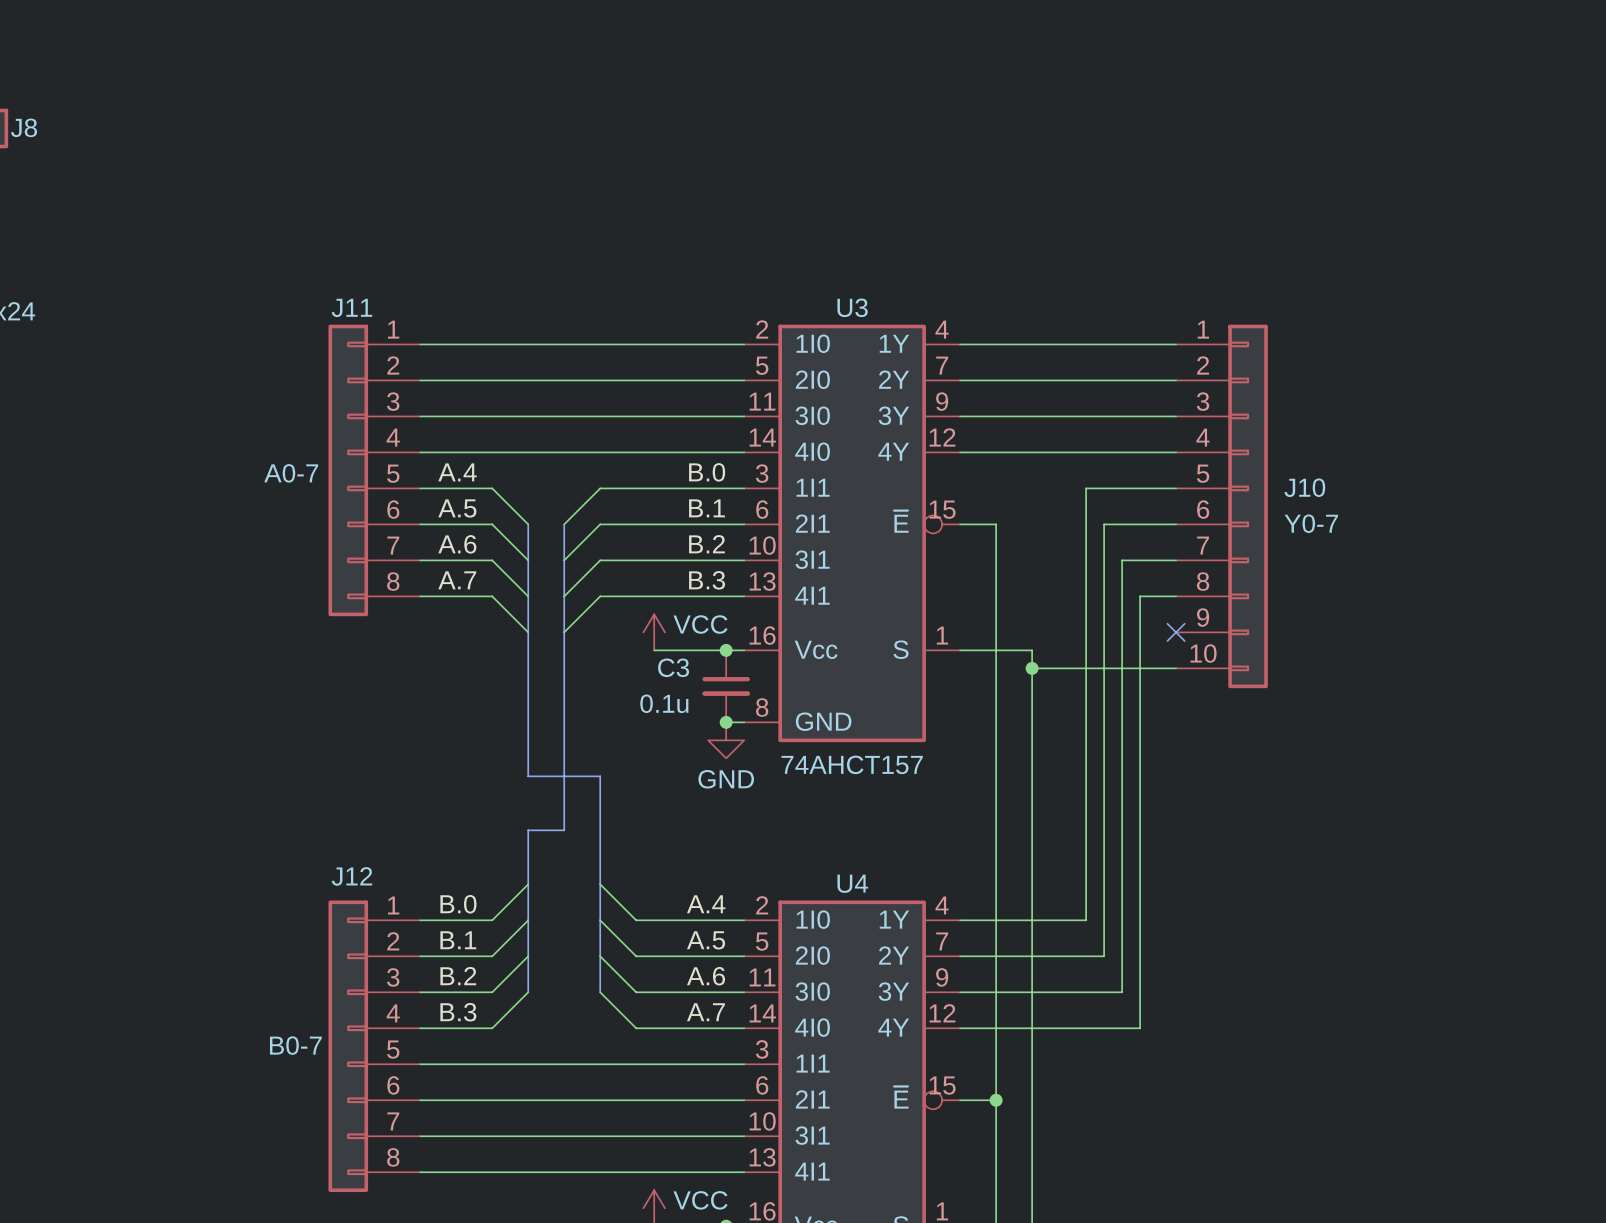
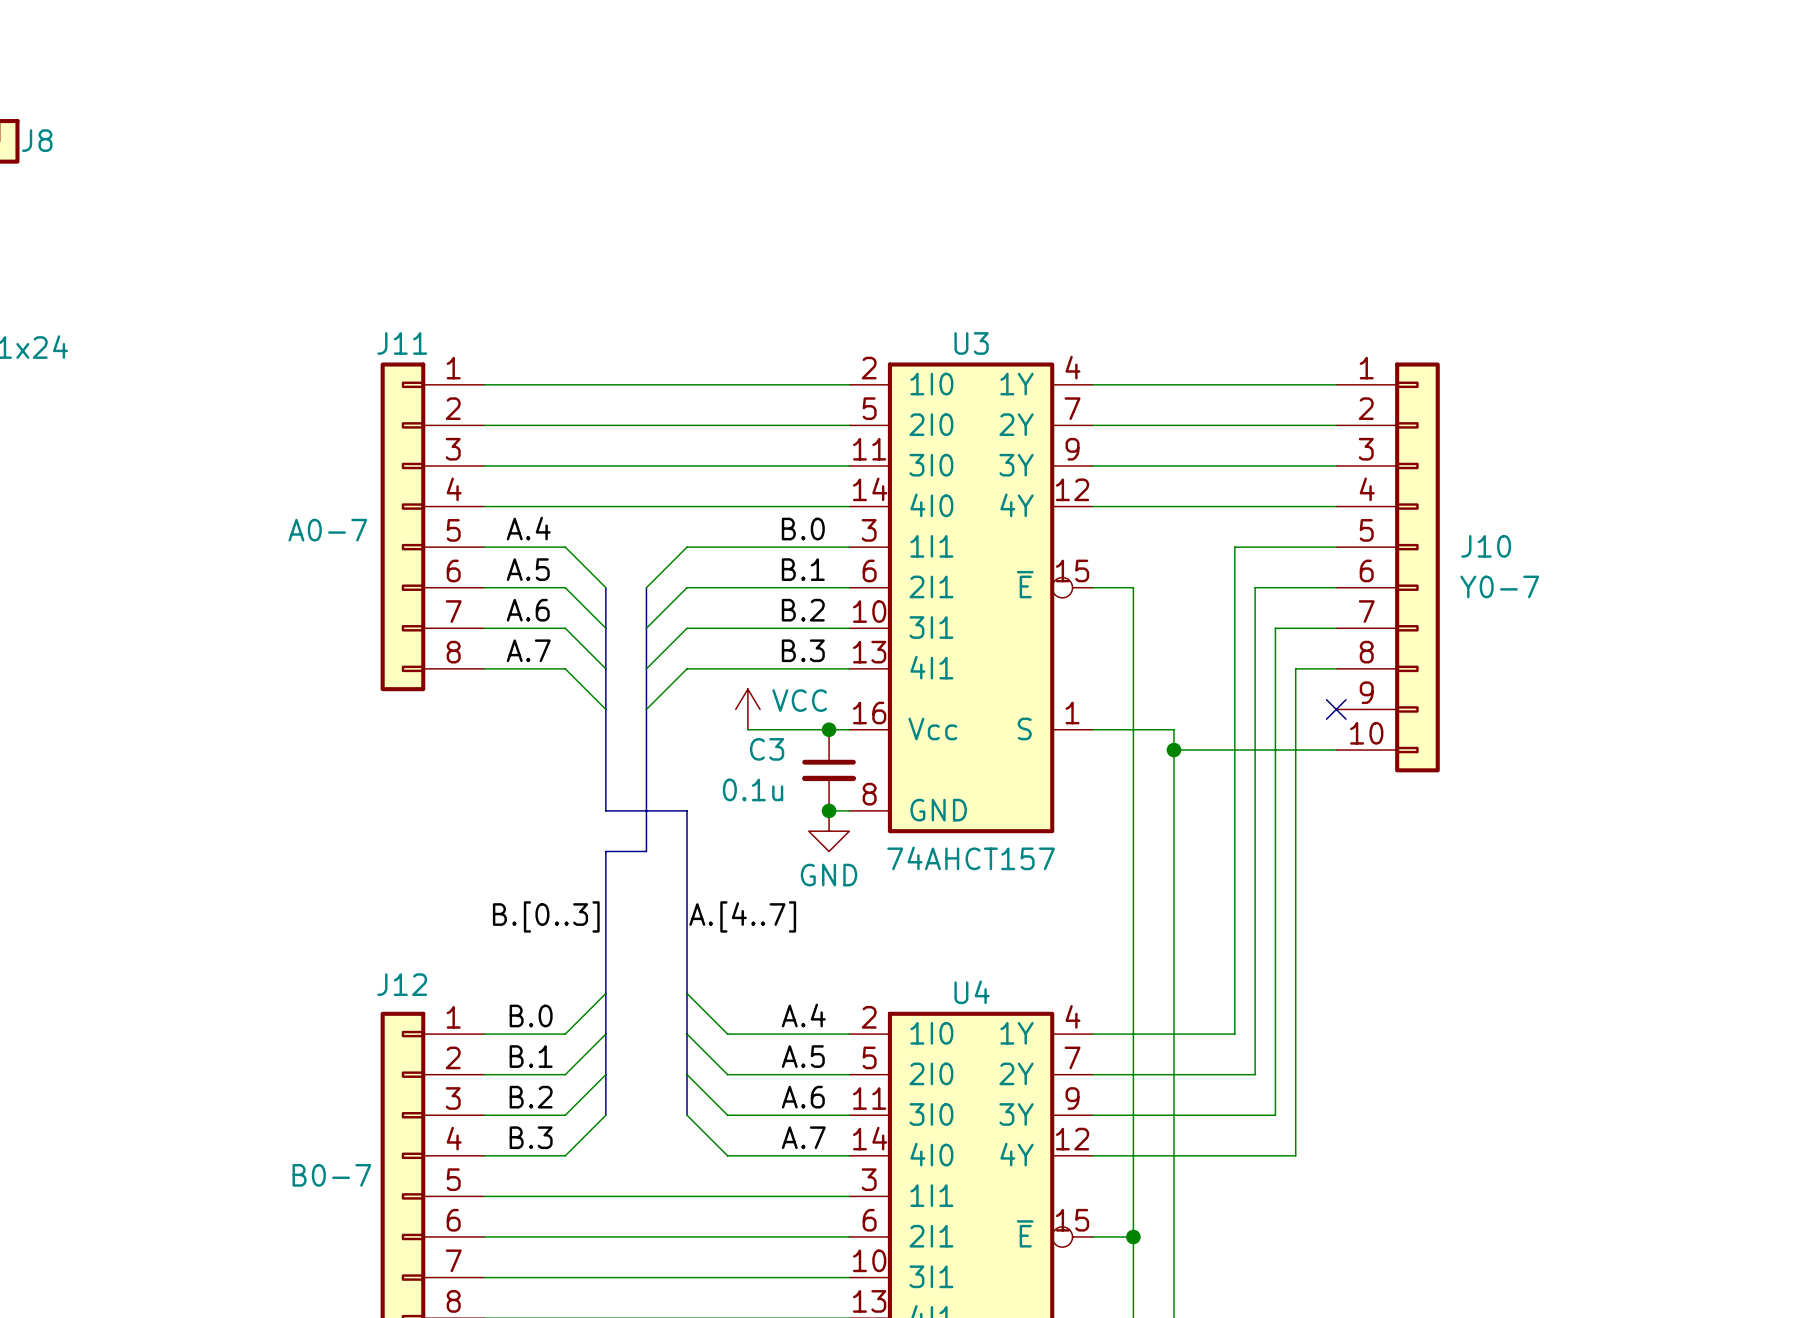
bus: (528, 722) (528, 758) -> (646, 851) (605, 851)
bus: (564, 758) (564, 830) (528, 830) -> (605, 871) (605, 932)
bus: (528, 776) (600, 776) -> (605, 810) (687, 810) (687, 871)
label: none -> B.[0..3] (546, 916)
label: none -> A.[4..7] (742, 916)

